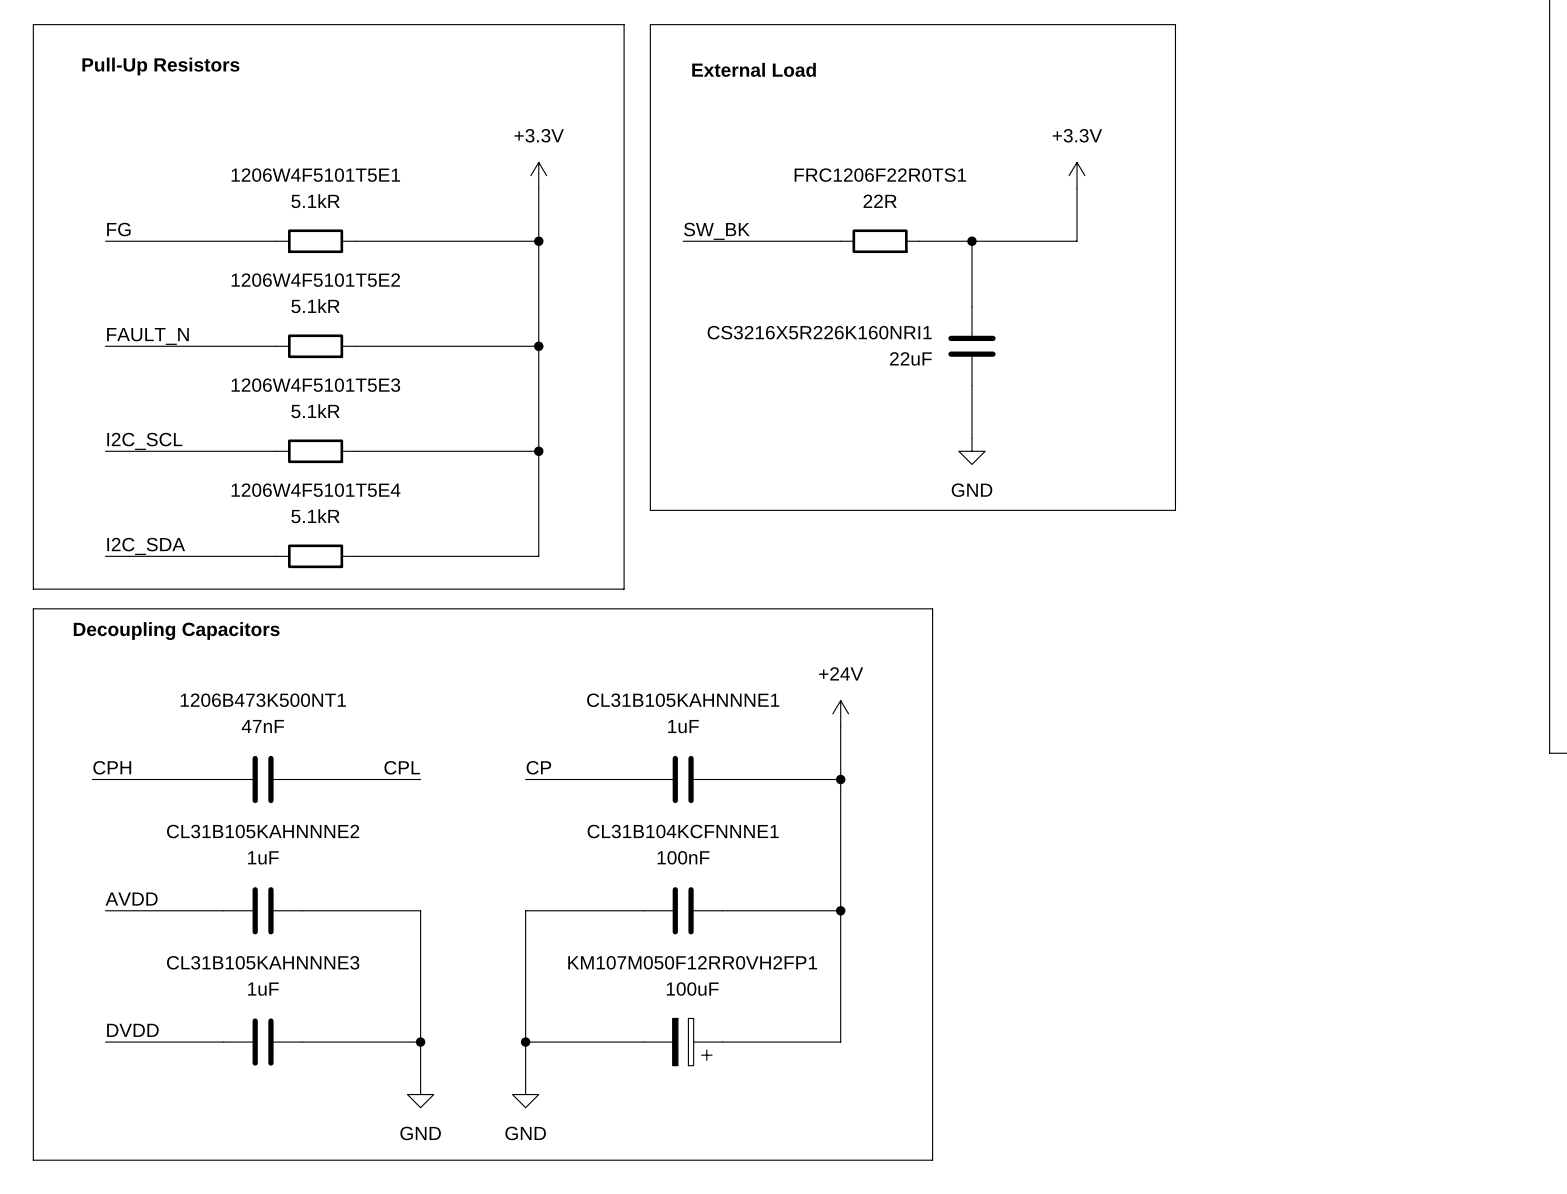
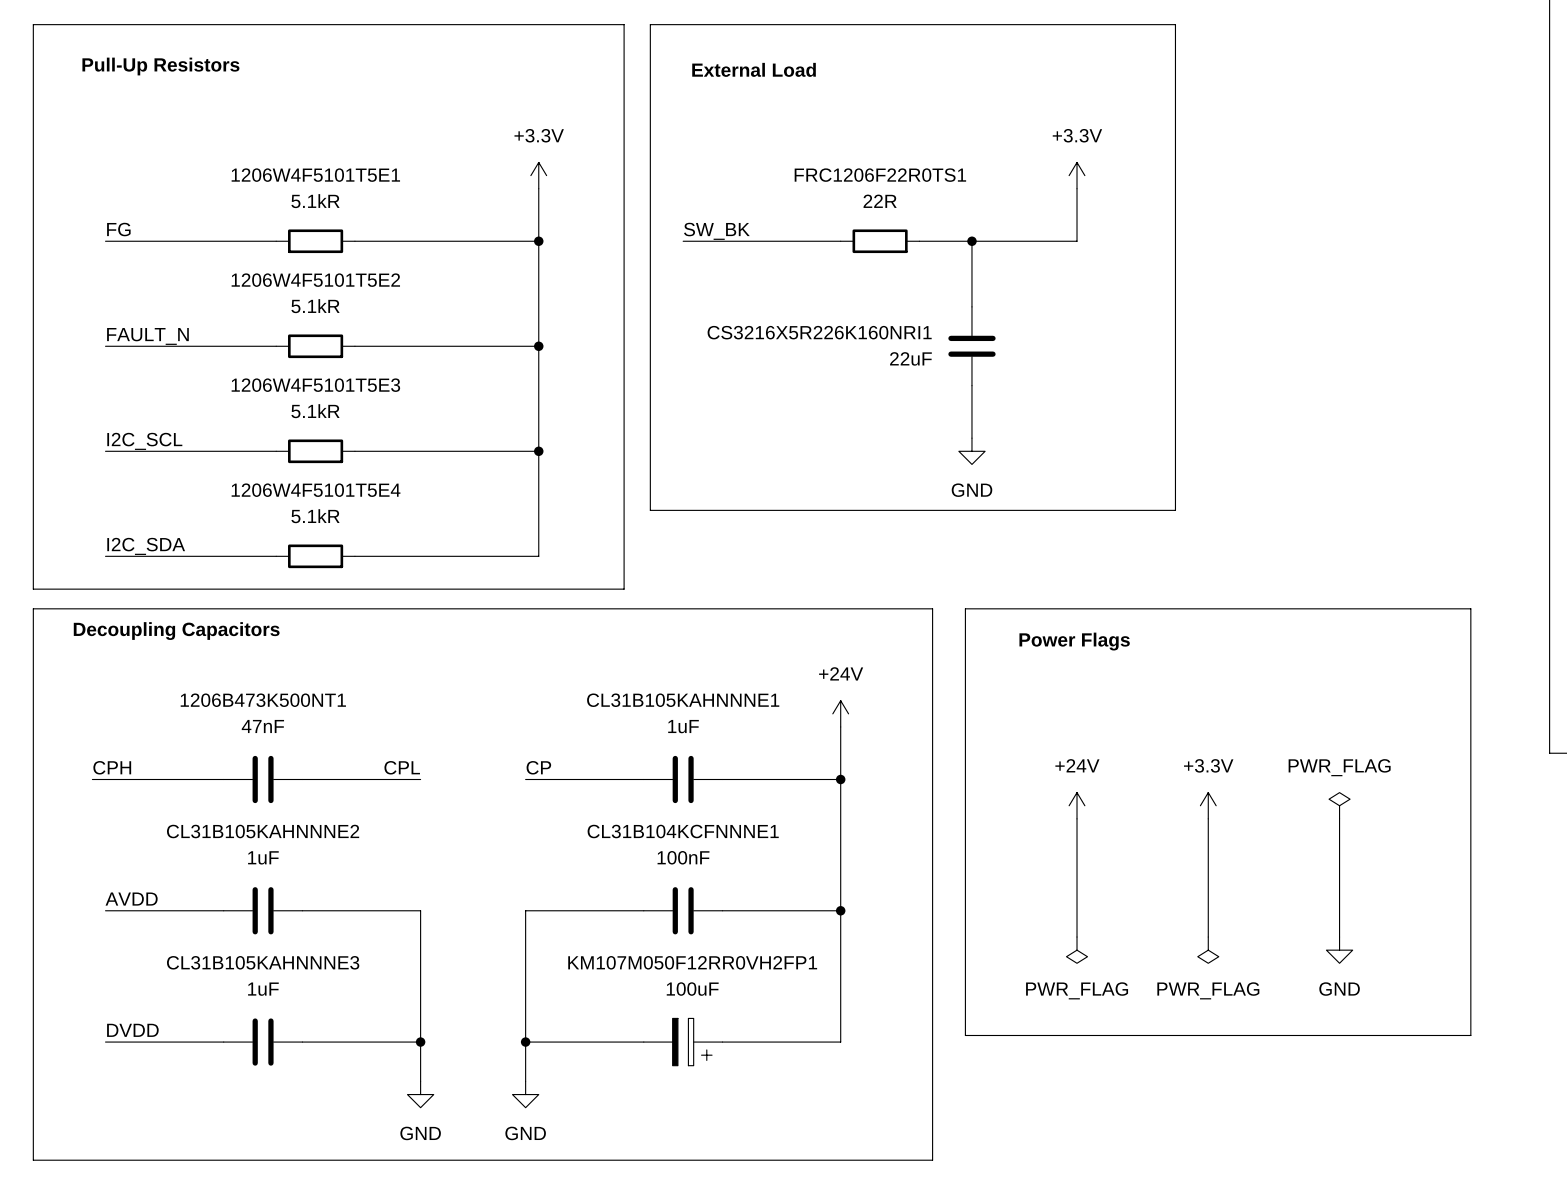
line: none -> (965, 608) (1470, 608) (1470, 1035) (965, 1035) (965, 608)
text: none -> Power Flags (1074, 641)
power symbol: none -> +24V (1077, 805)
power symbol: none -> +3.3V (1208, 805)
power symbol: none -> PWR_FLAG (1339, 805)
wire: none -> (1077, 818) (1077, 937)
wire: none -> (1208, 818) (1208, 937)
wire: none -> (1339, 818) (1339, 937)
power symbol: none -> PWR_FLAG (1077, 950)
power symbol: none -> PWR_FLAG (1208, 950)
power symbol: none -> GND (1339, 950)

